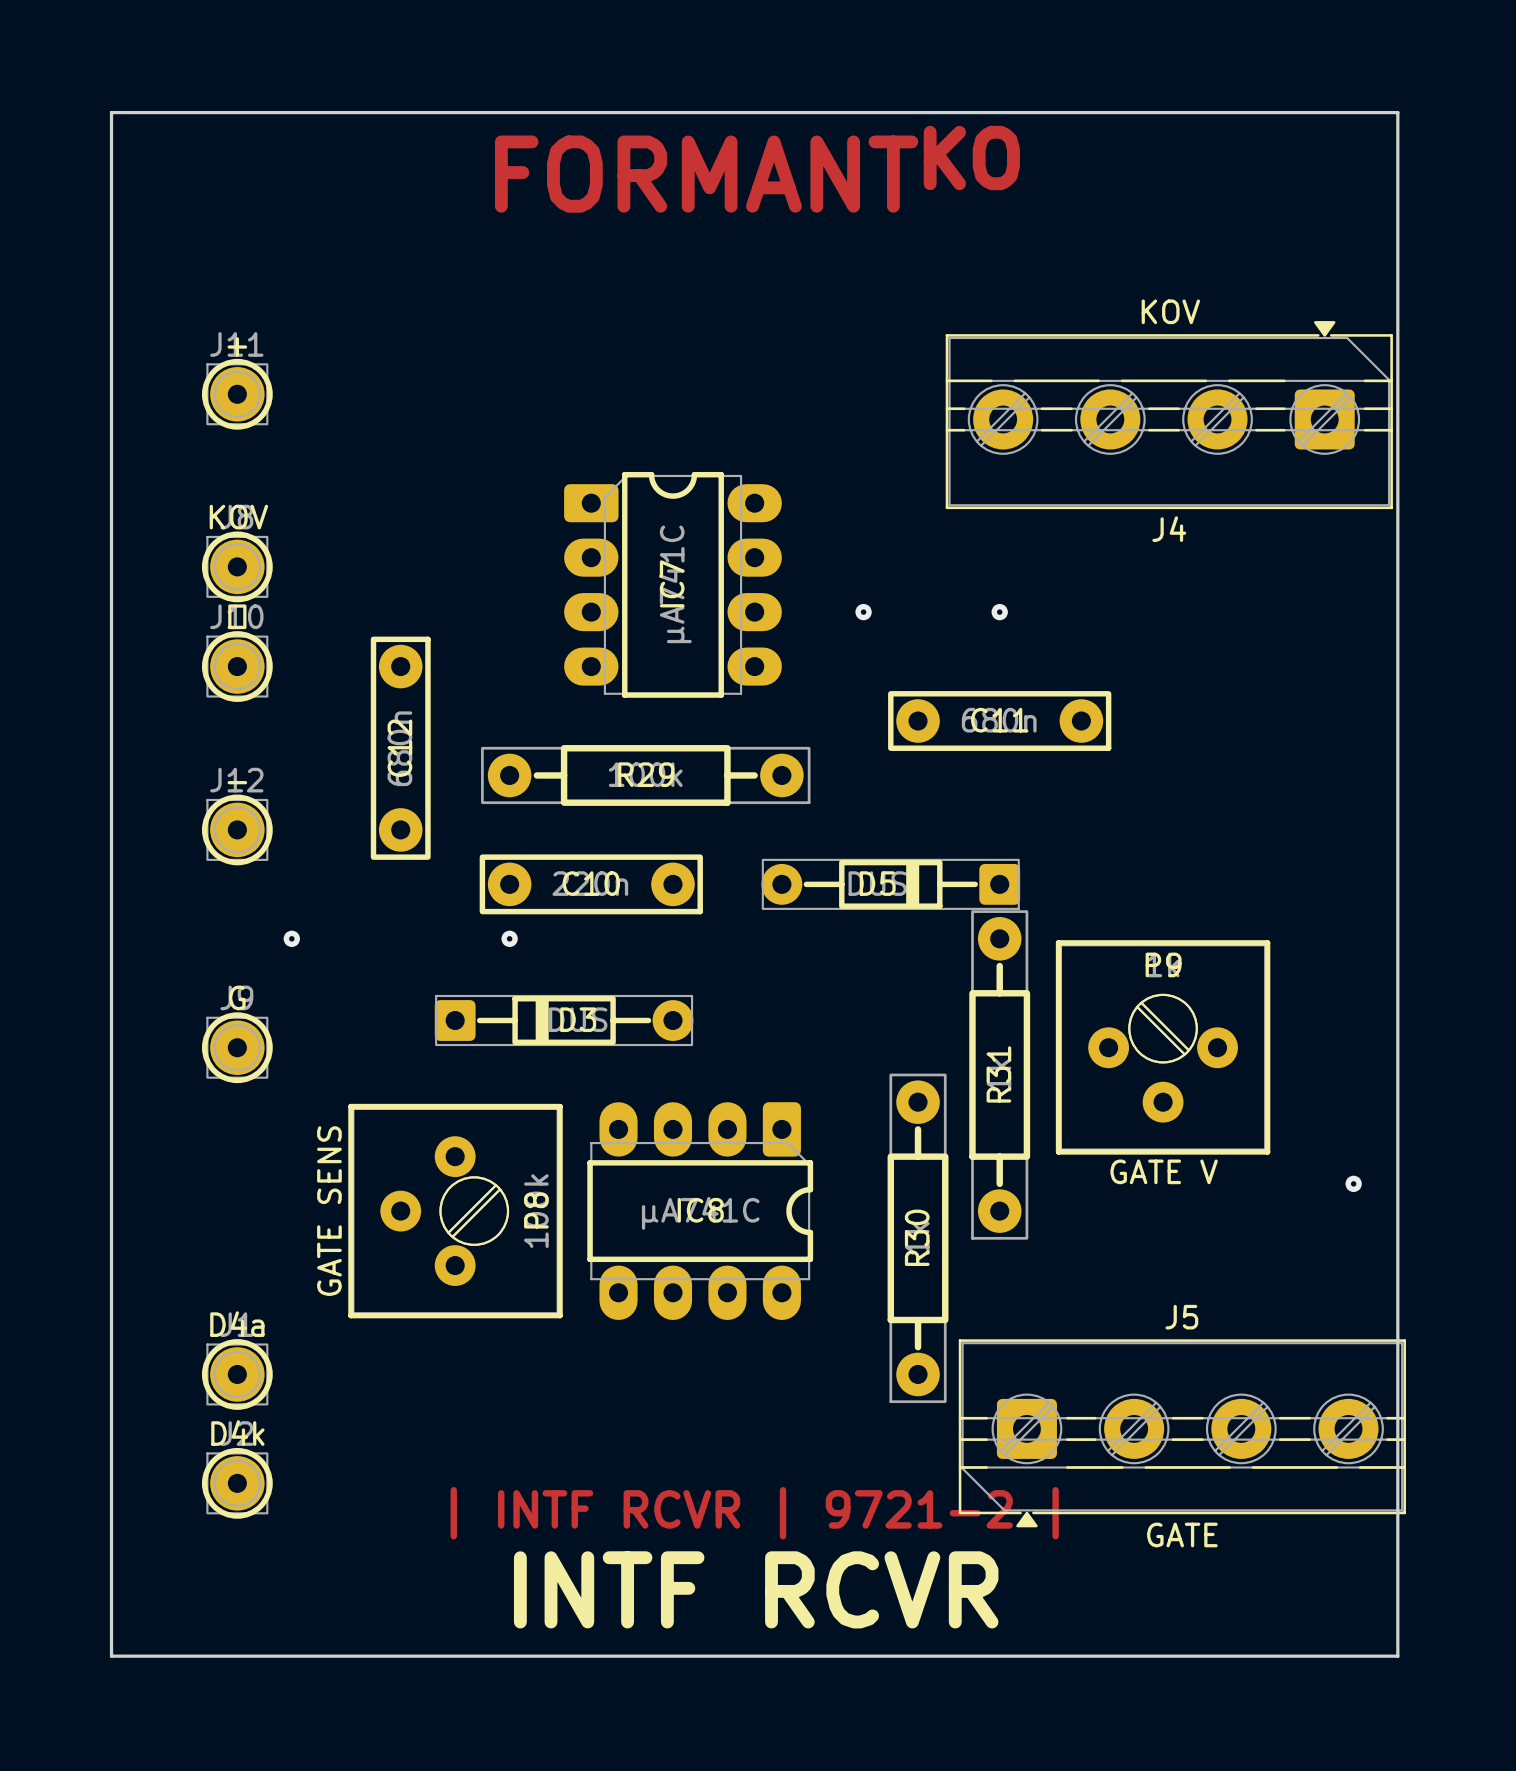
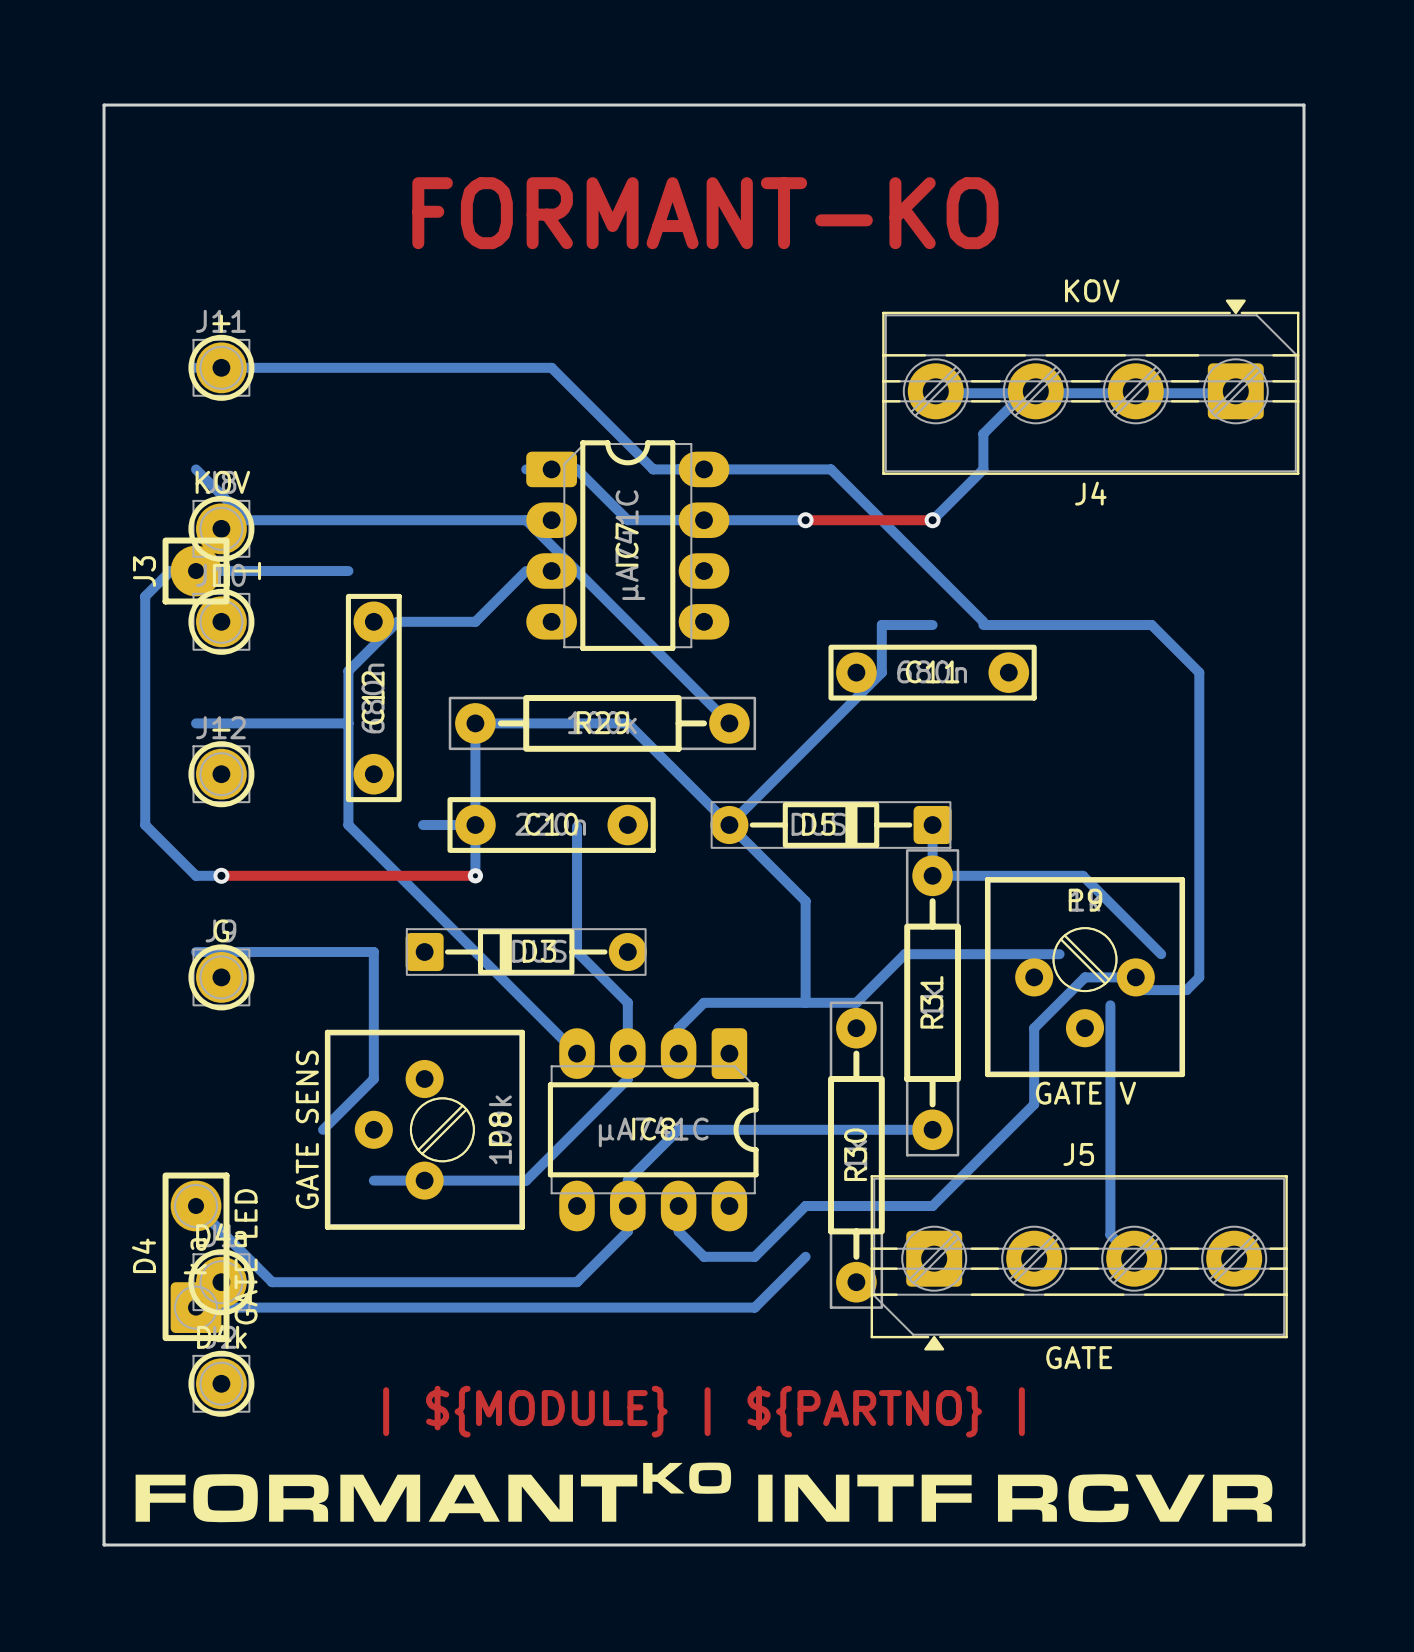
text: FORMANTKO (757, 169) -> FORMANT-KO (705, 213)
bottom track: none -> (196, 367) (551, 367) (653, 469) (831, 469) (983, 621)
bottom track: none -> (924, 393) (1224, 393)
bottom track: none -> (1024, 393) (983, 433) (983, 469) (932, 520)
bottom track: none -> (196, 469) (246, 520) (526, 520) (729, 723)
bottom track: none -> (526, 469) (577, 469) (627, 520) (805, 520)
top track: none -> (805, 520) (932, 520)
via: none -> (805, 520)
via: none -> (932, 520)
J3: none -> (211, 571)
bottom track: none -> (348, 571) (170, 571) (145, 596) (145, 825) (196, 875) (221, 875)
bottom track: none -> (526, 571) (475, 621) (397, 621) (348, 671) (348, 825) (577, 1053)
via: (863, 612) -> none
via: (999, 612) -> none
bottom track: none -> (932, 625) (881, 625) (881, 672) (729, 825)
bottom track: none -> (983, 625) (1151, 625) (1199, 672) (1199, 977) (1186, 990) (1138, 990) (1125, 977) (1085, 977) (1034, 1028) (1034, 1104) (932, 1206) (805, 1206) (754, 1256) (704, 1256) (678, 1231) (678, 1206)
bottom track: none -> (196, 723) (348, 723)
bottom track: none -> (423, 825) (475, 825)
bottom track: none -> (932, 825) (932, 875) (1082, 875) (1161, 954)
bottom track: none -> (577, 826) (577, 952) (627, 1002) (627, 1079) (526, 1180) (373, 1180)
top track: none -> (221, 875) (475, 875)
via: none -> (221, 875)
via: (291, 938) -> none
bottom track: none -> (475, 875) (475, 723) (627, 723) (805, 901) (805, 1002)
bottom track: none -> (196, 952) (373, 952) (373, 1079) (323, 1129)
bottom track: none -> (1059, 954) (905, 954) (856, 1002) (704, 1002) (678, 1028) (678, 1053)
bottom track: none -> (1110, 1005) (1110, 1234) (1134, 1258)
via: (1353, 1183) -> none
bottom track: none -> (932, 1129) (678, 1129) (627, 1180) (627, 1231) (577, 1282) (272, 1282) (196, 1206)
D4: none -> (196, 1256)
bottom track: none -> (805, 1256) (754, 1307) (196, 1307)
J5 position: (1182, 1433) -> (1079, 1262)
text: | INTF RCVR | 9721-2 | (754, 1513) -> | ${MODULE} | ${PARTNO} | (704, 1411)
drawing: none -> [135, 1462, 732, 1523]
drawing: none -> [758, 1474, 972, 1522]
drawing: none -> [997, 1474, 1273, 1523]
text: INTF RCVR (756, 1589) -> none

